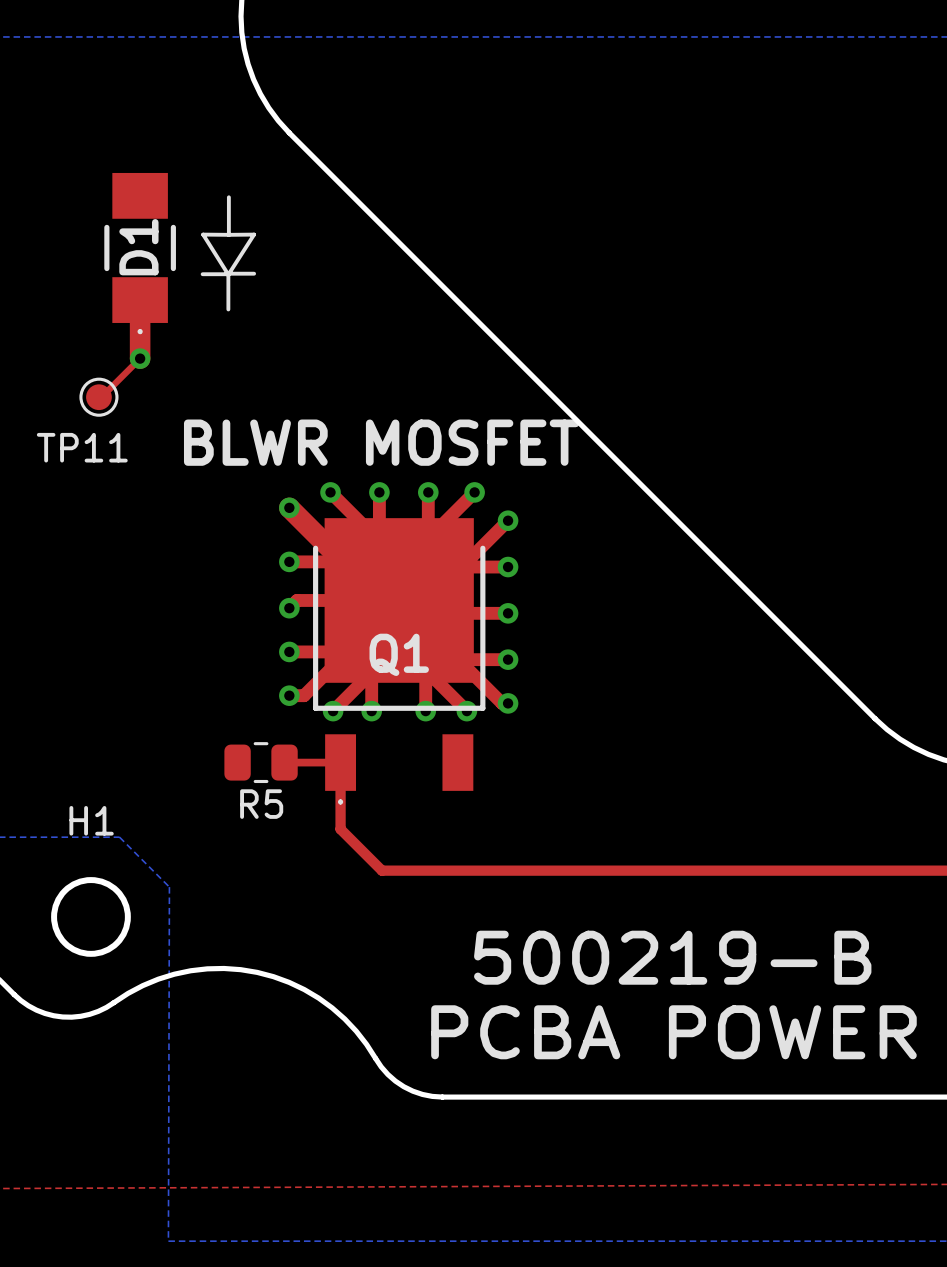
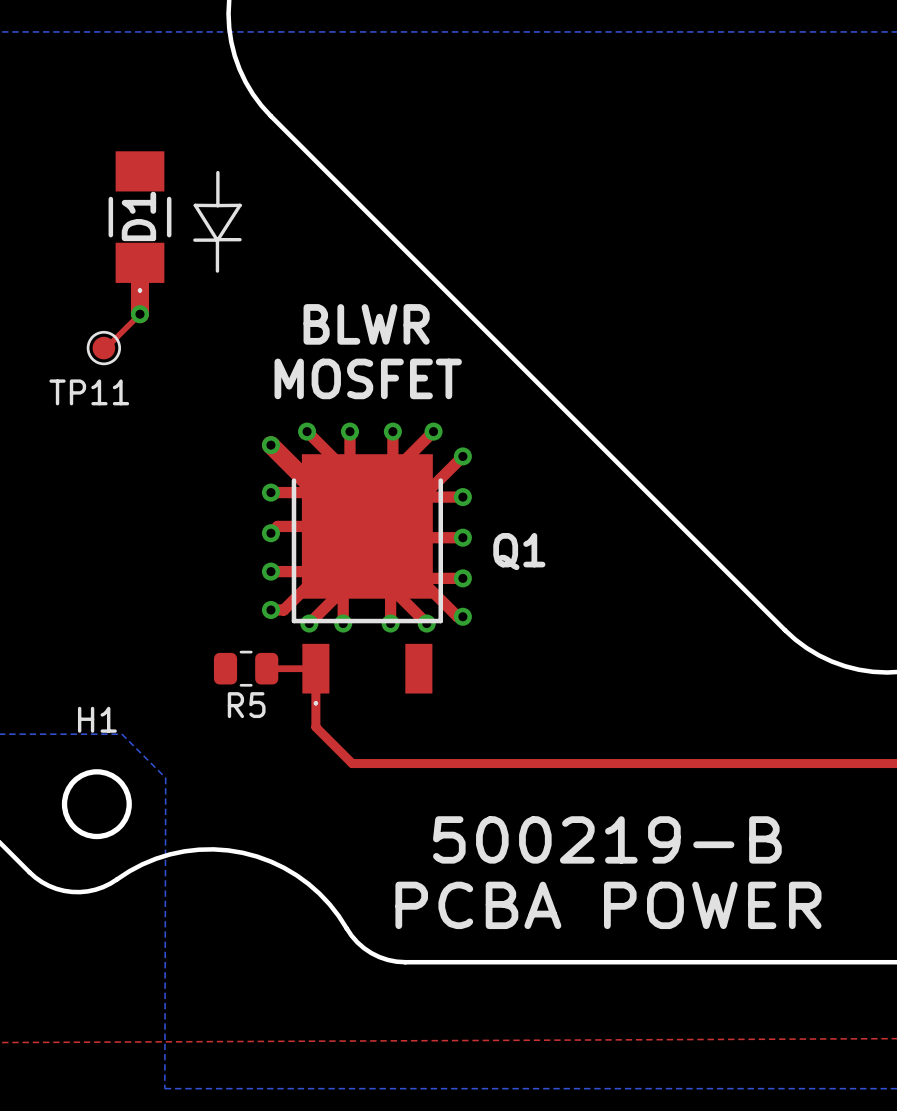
text: none -> BLWR (366, 324)
text: BLWR MOSFET (381, 442) -> MOSFET (368, 378)
Q1 name position: Q1 (399, 654) -> Q1 (519, 551)

